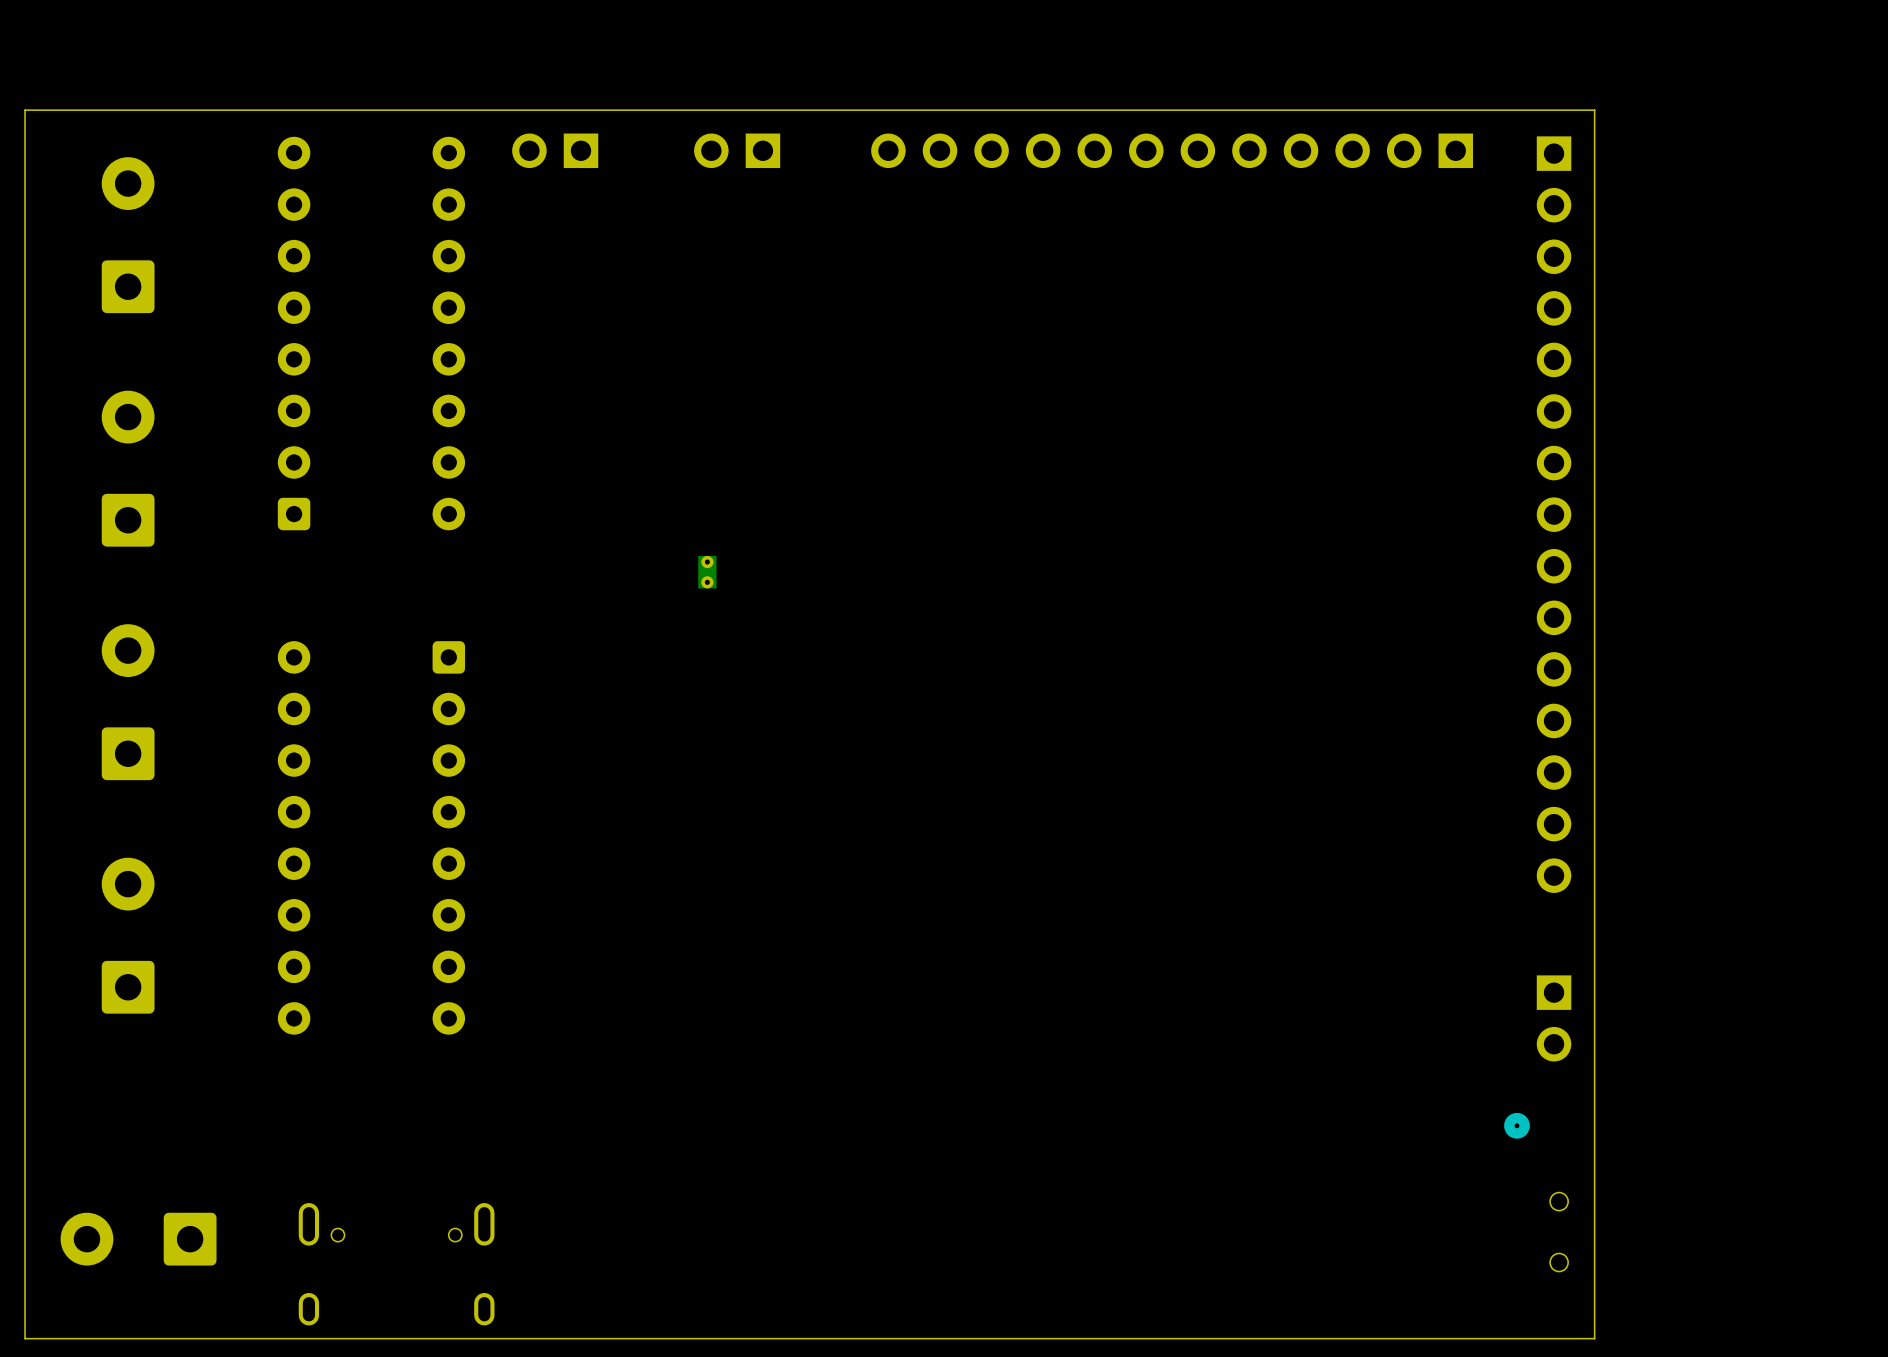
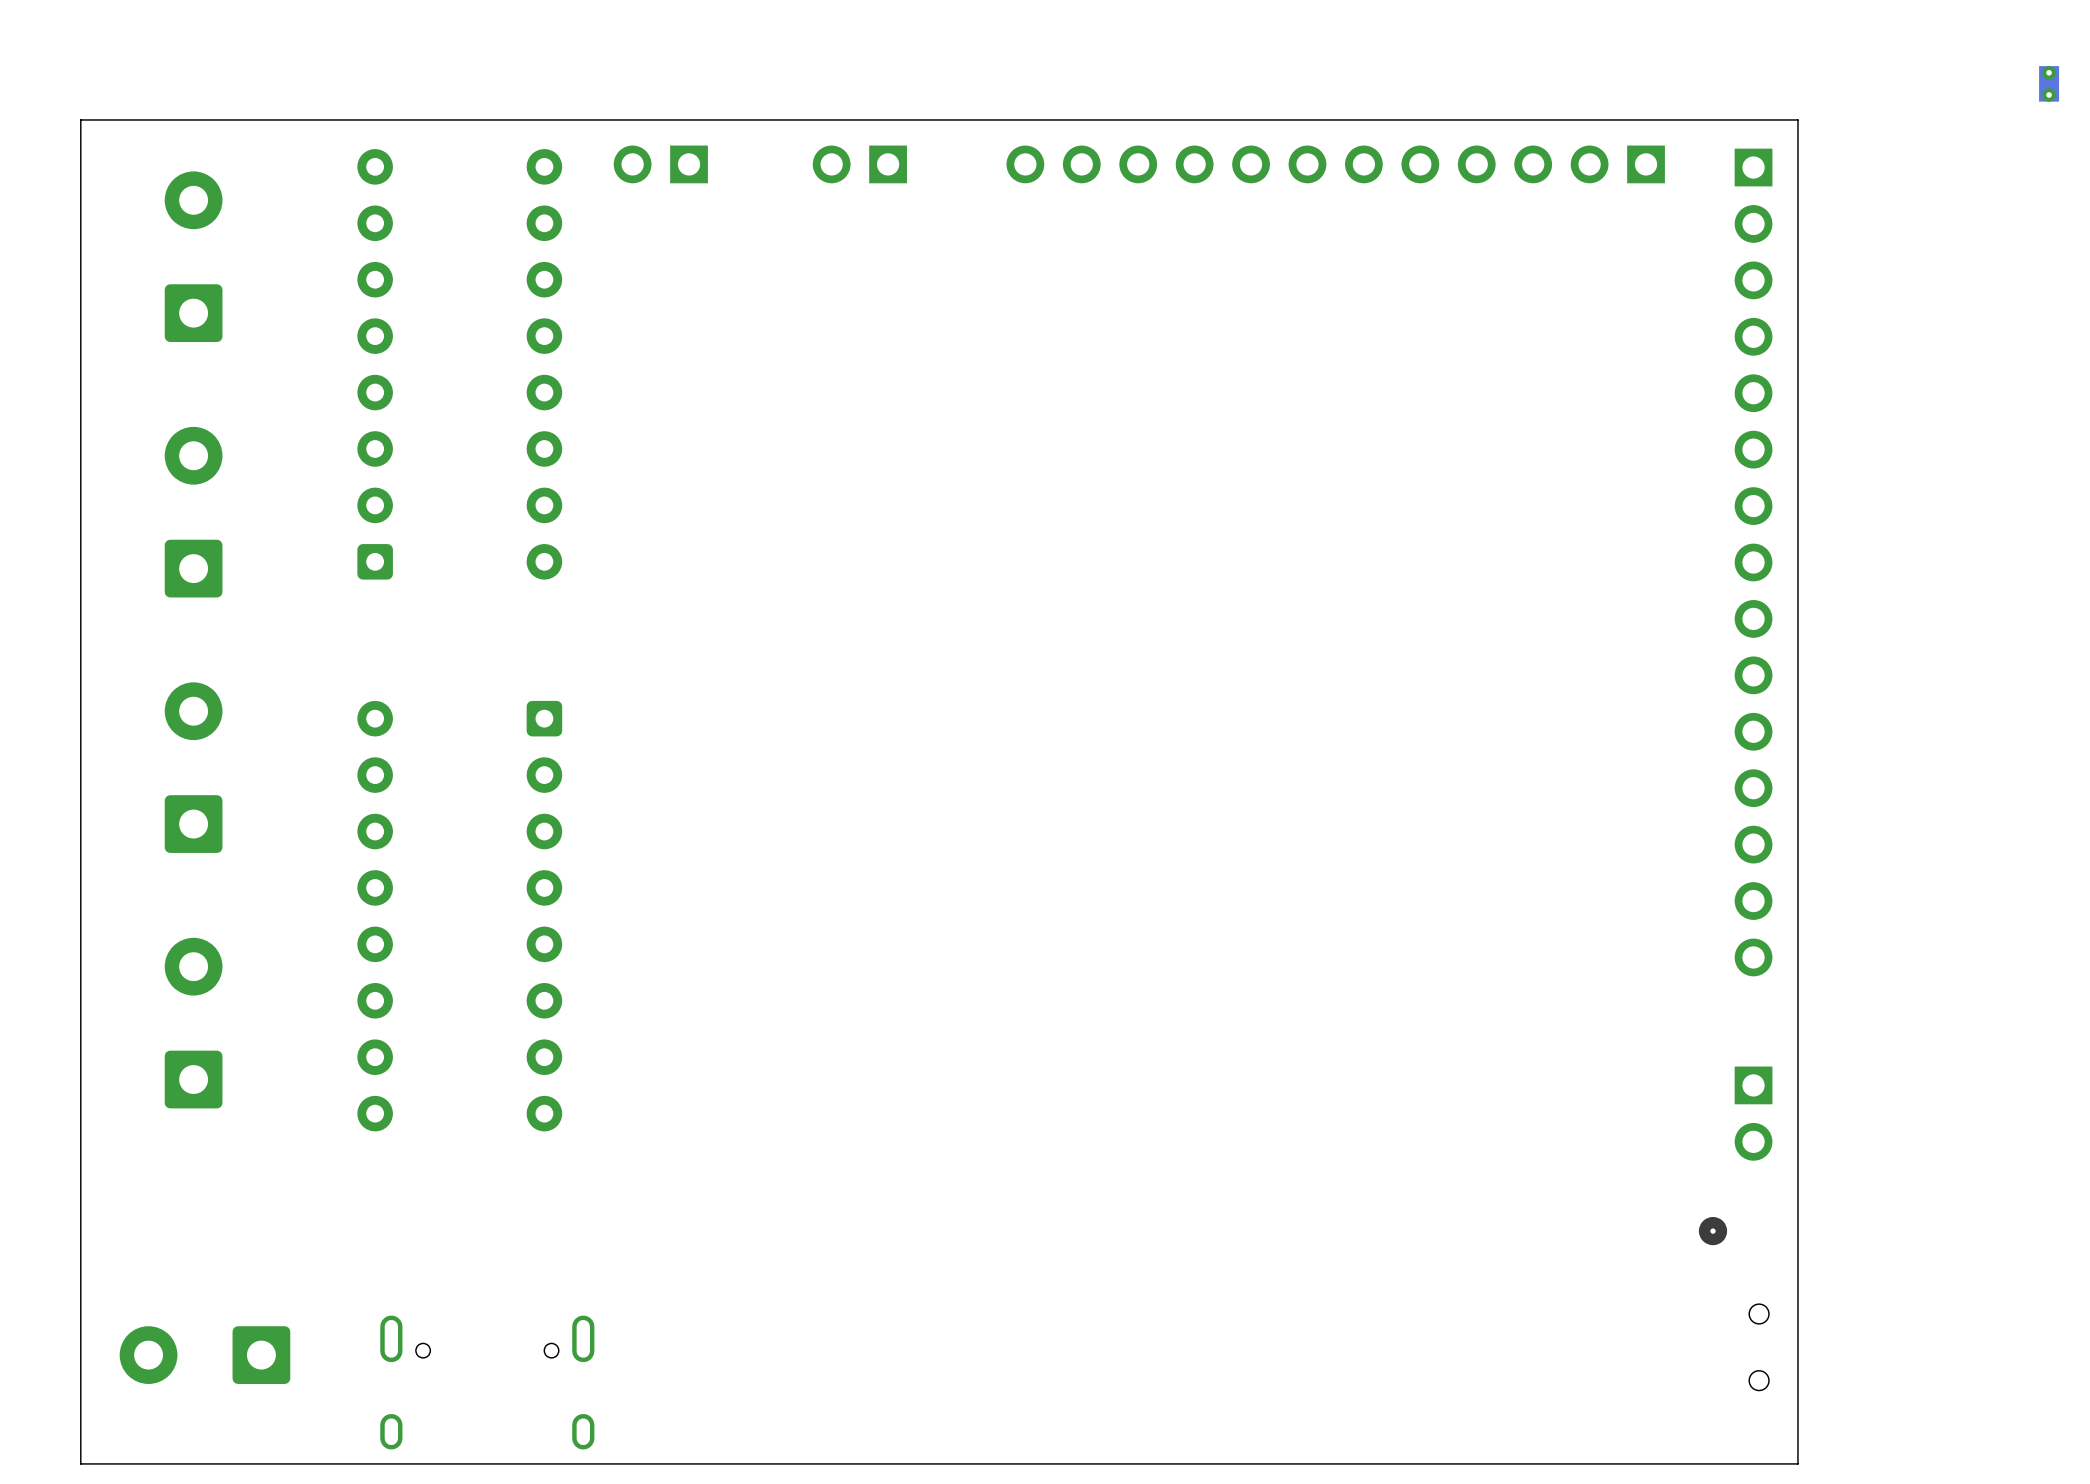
part: none -> (2049, 83)
part: (707, 572) -> none

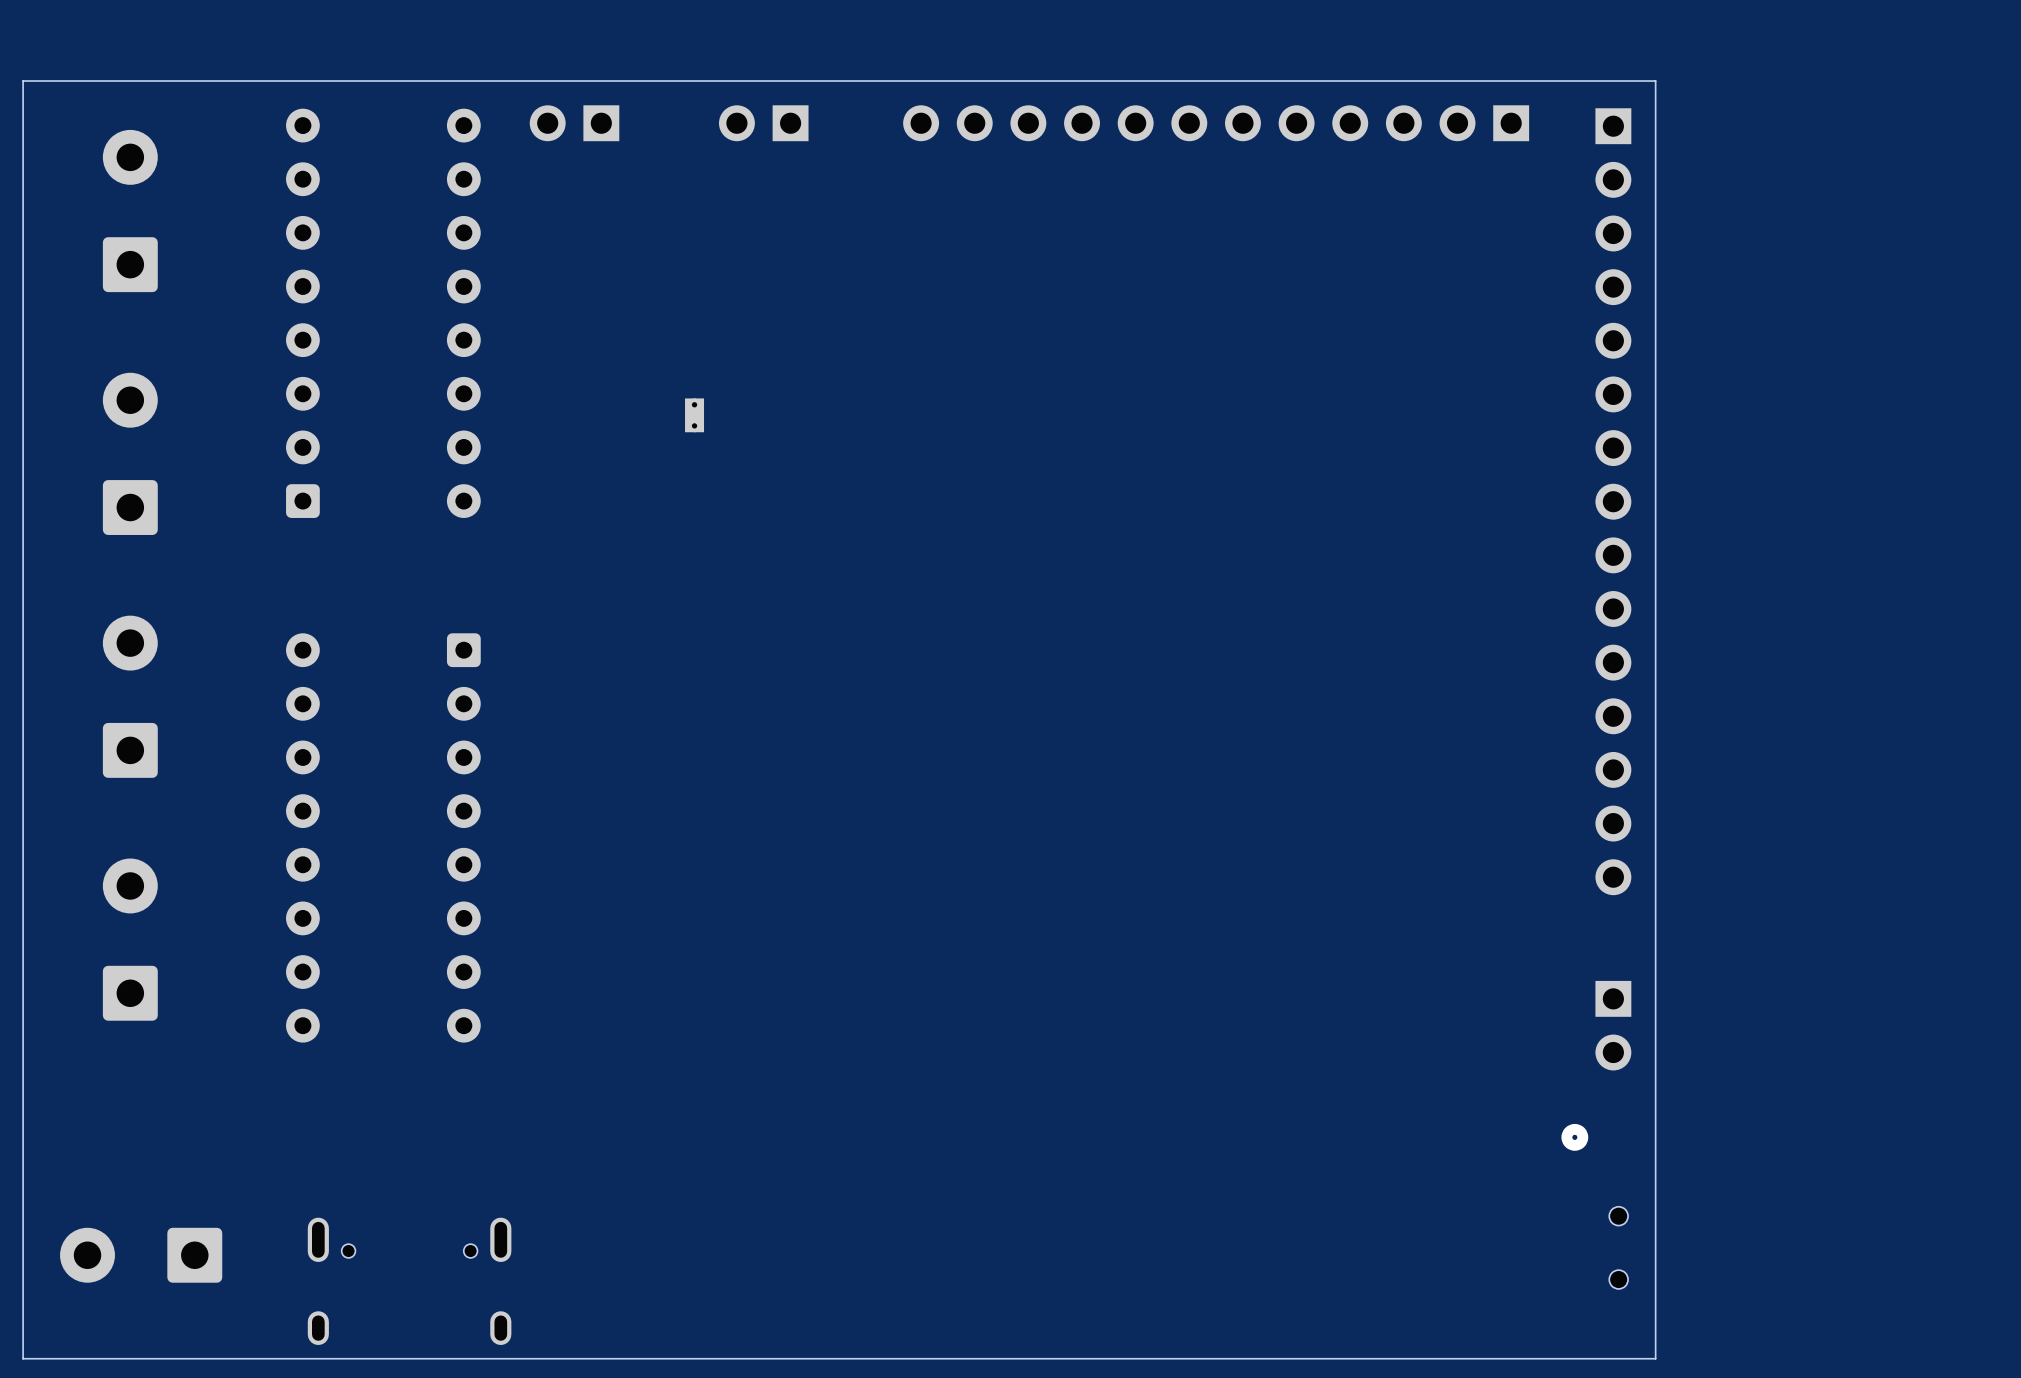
part: (2049, 83) -> none
part: none -> (694, 415)

